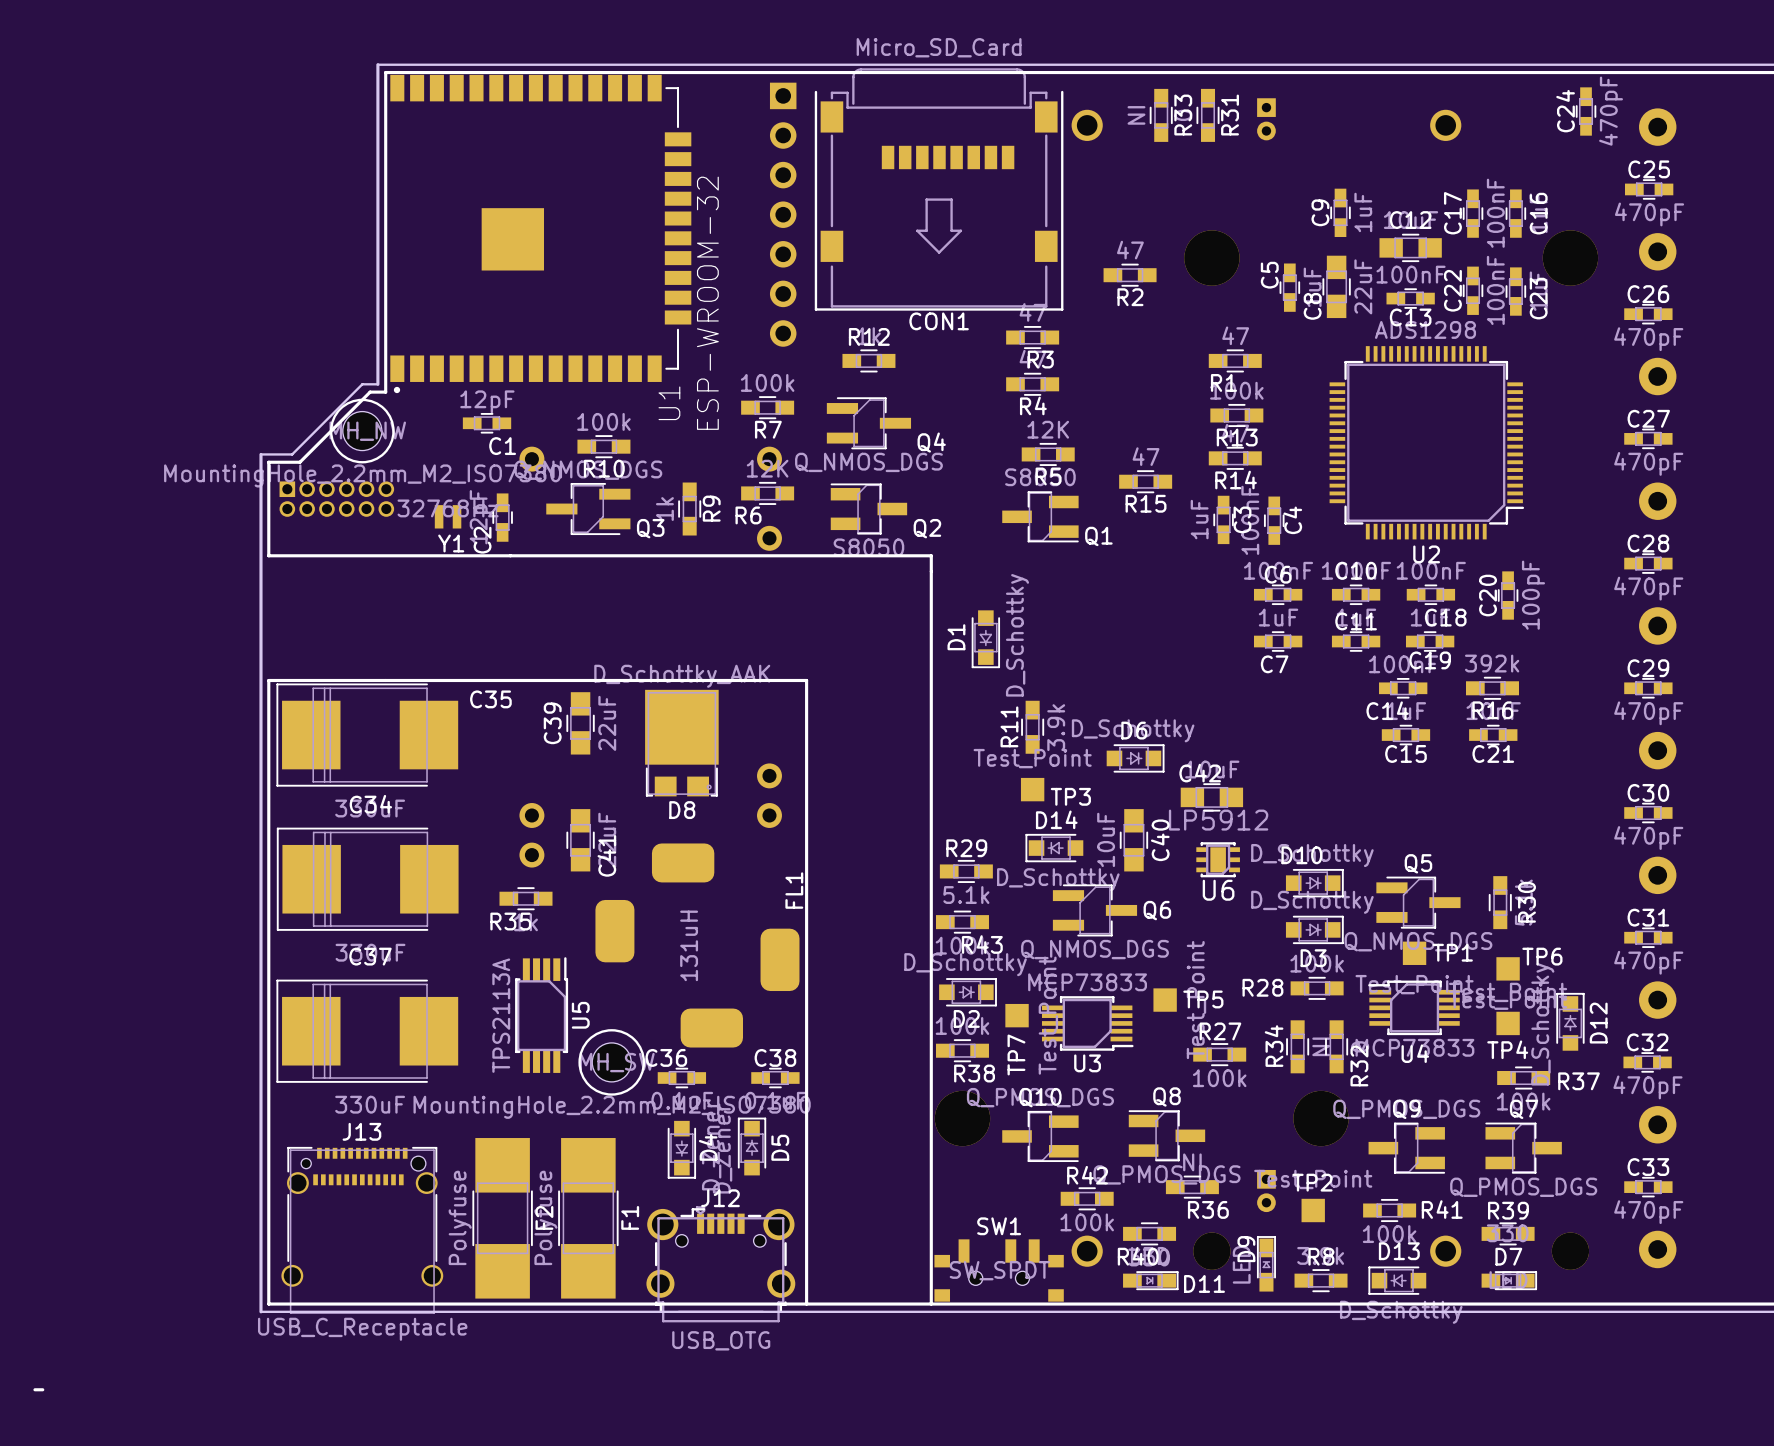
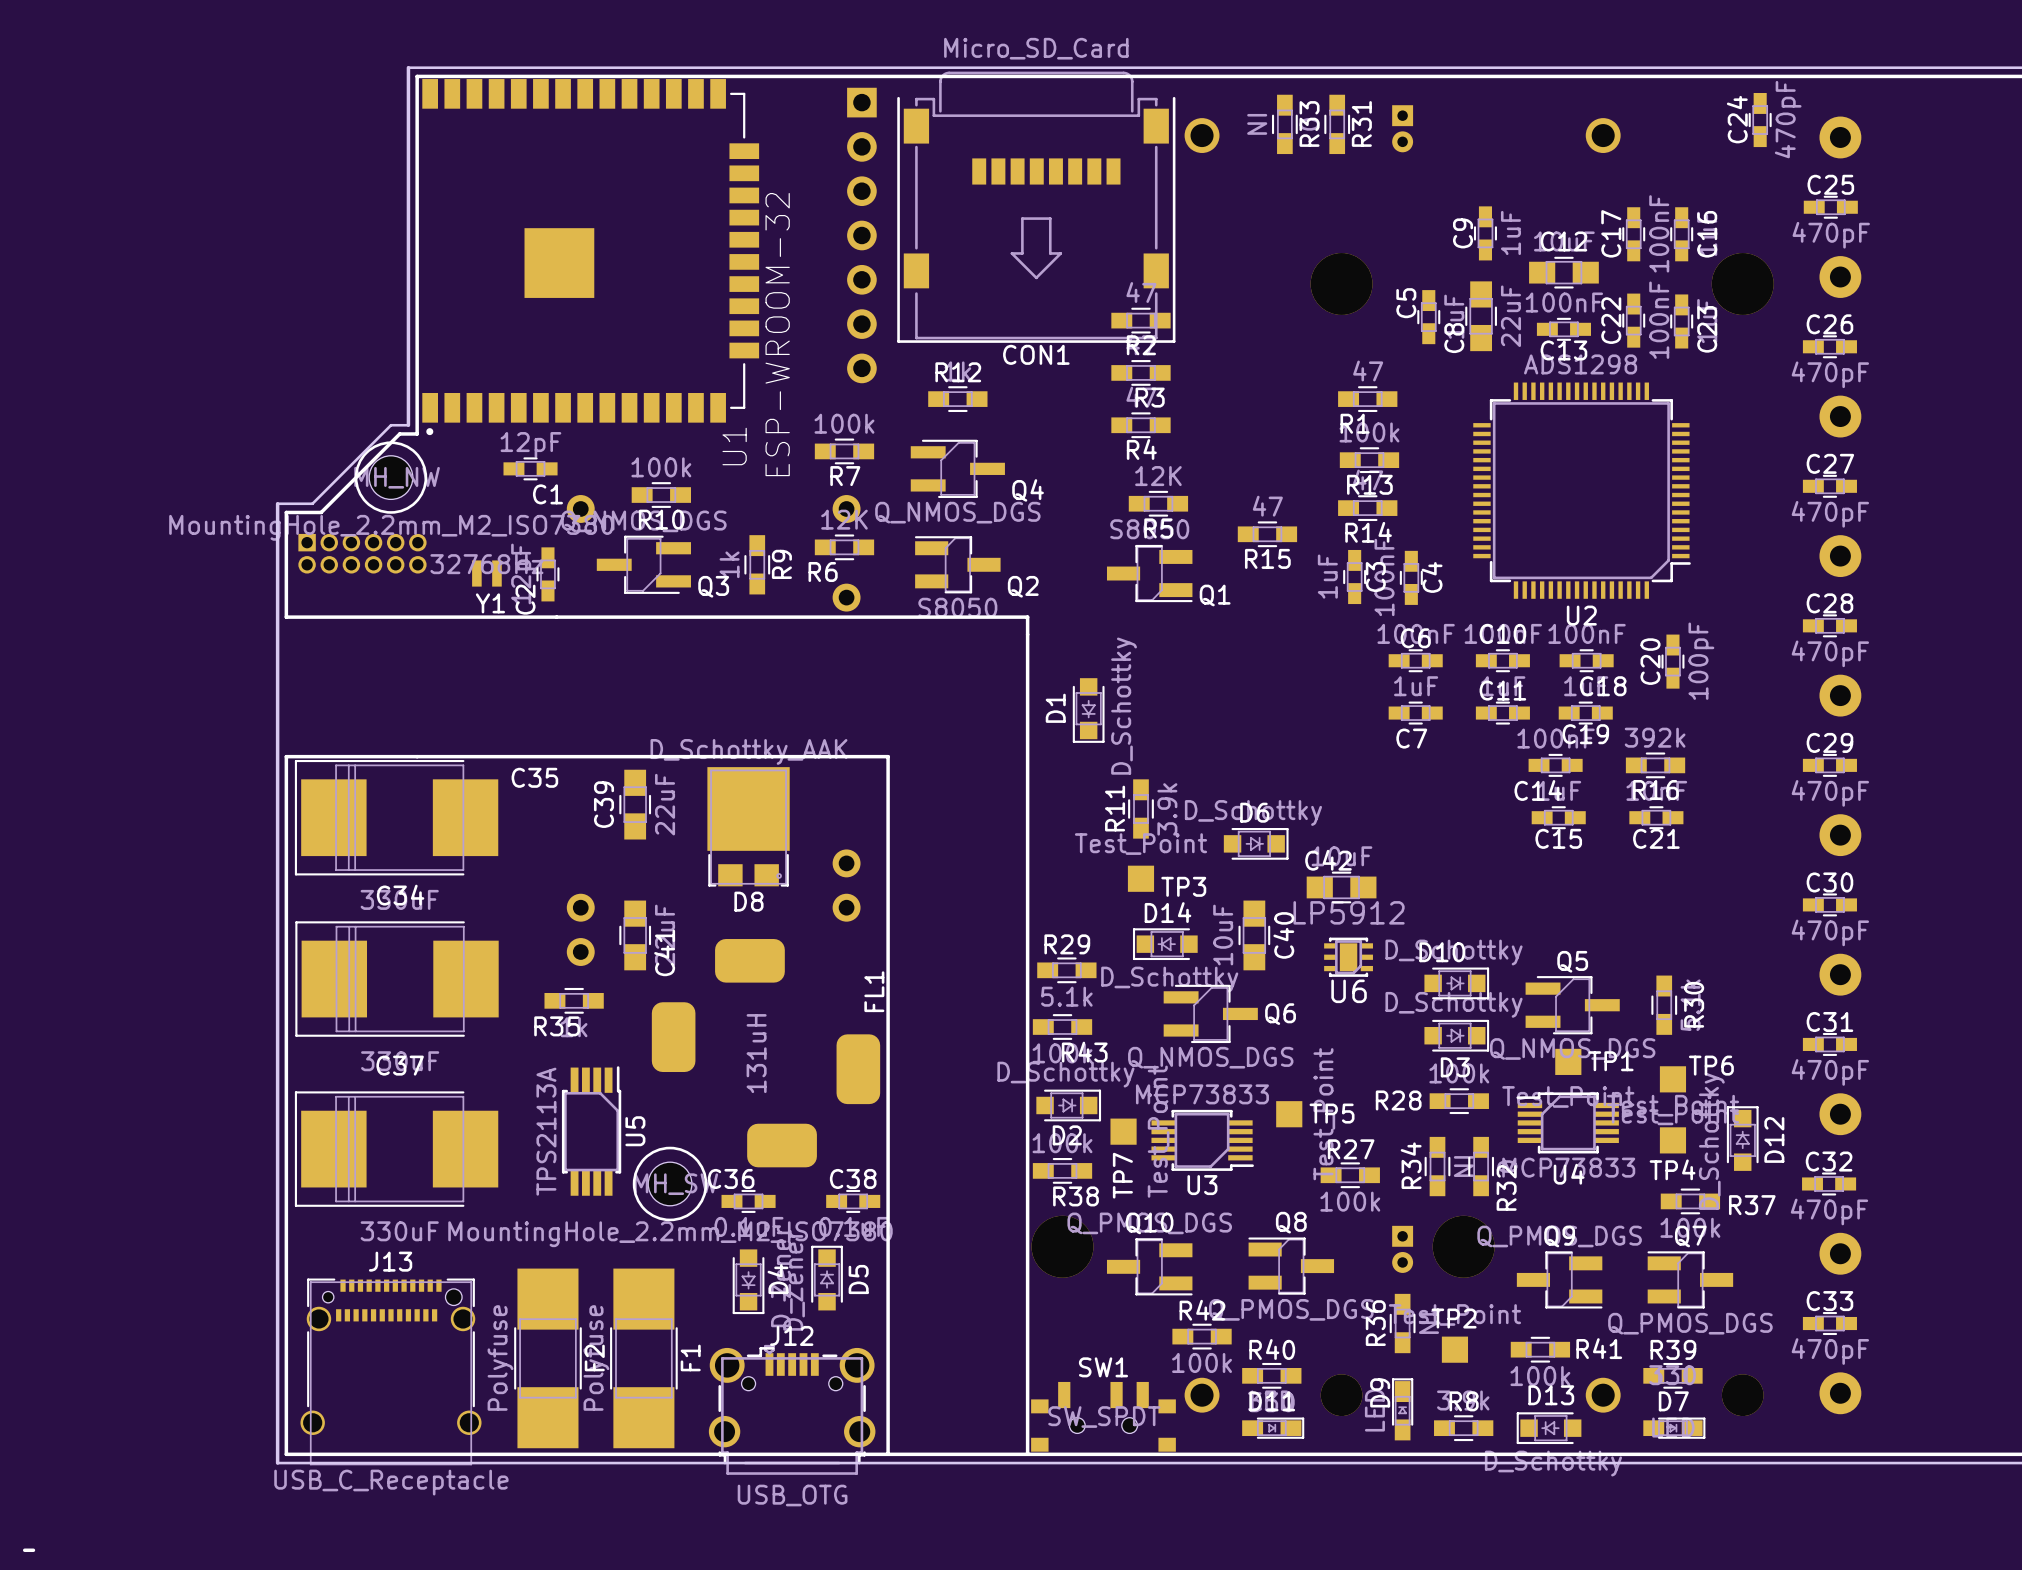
R2 position: (1130, 275) -> (1140, 320)
R36 rotation: 0° (1192, 1187) -> 90° clockwise (1402, 1323)
R36 position: (1192, 1187) -> (1402, 1323)
part position: (1266, 1191) -> (1402, 1249)
R40 name position: R40 (1138, 1256) -> R40 (1272, 1349)
D11 name position: D11 (1204, 1283) -> D11 (1272, 1401)

